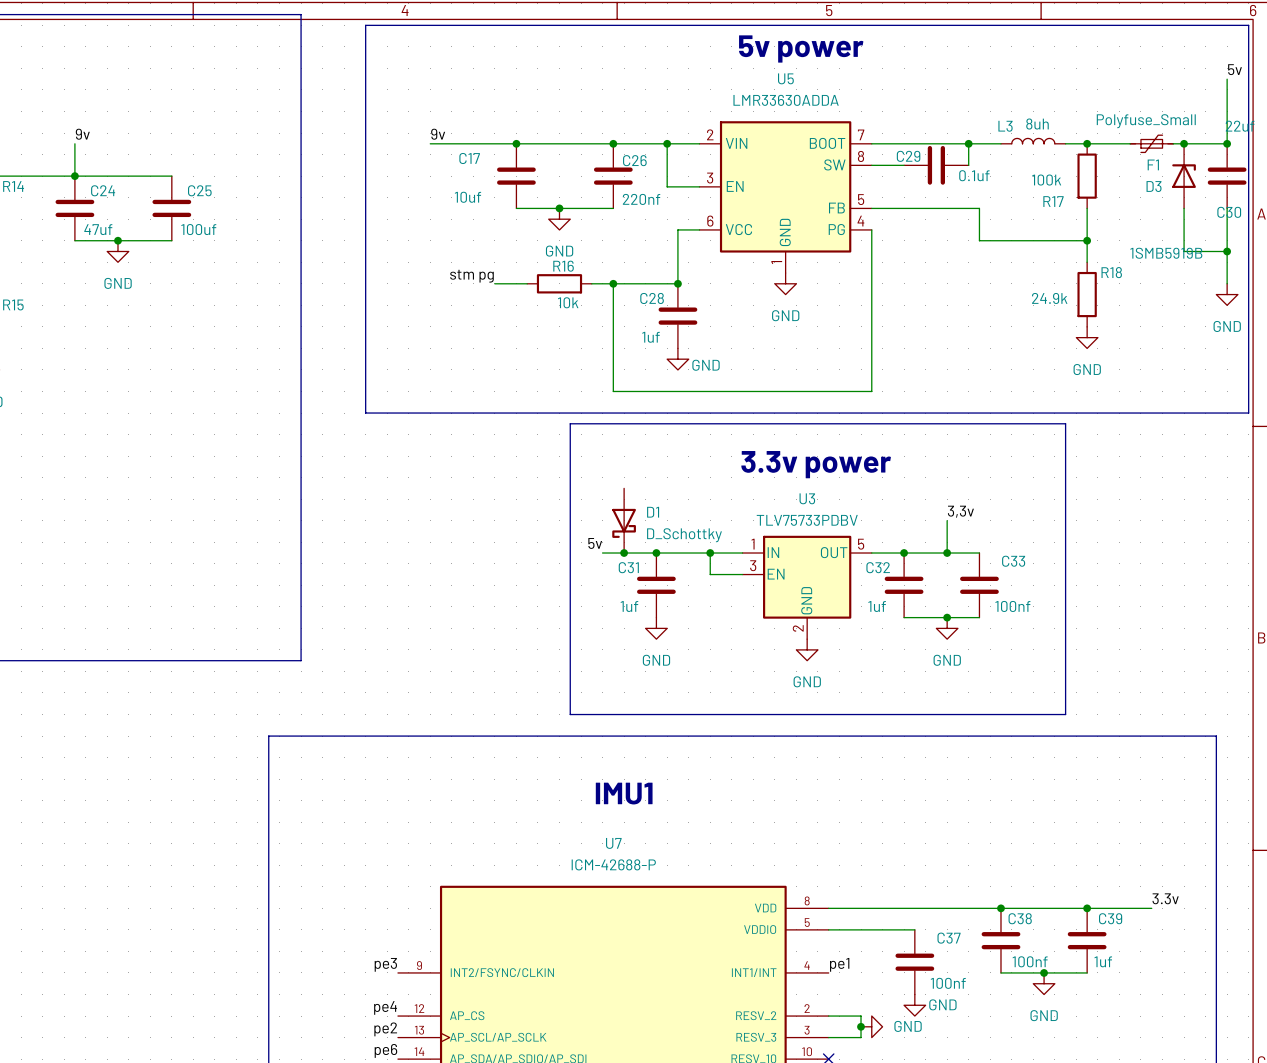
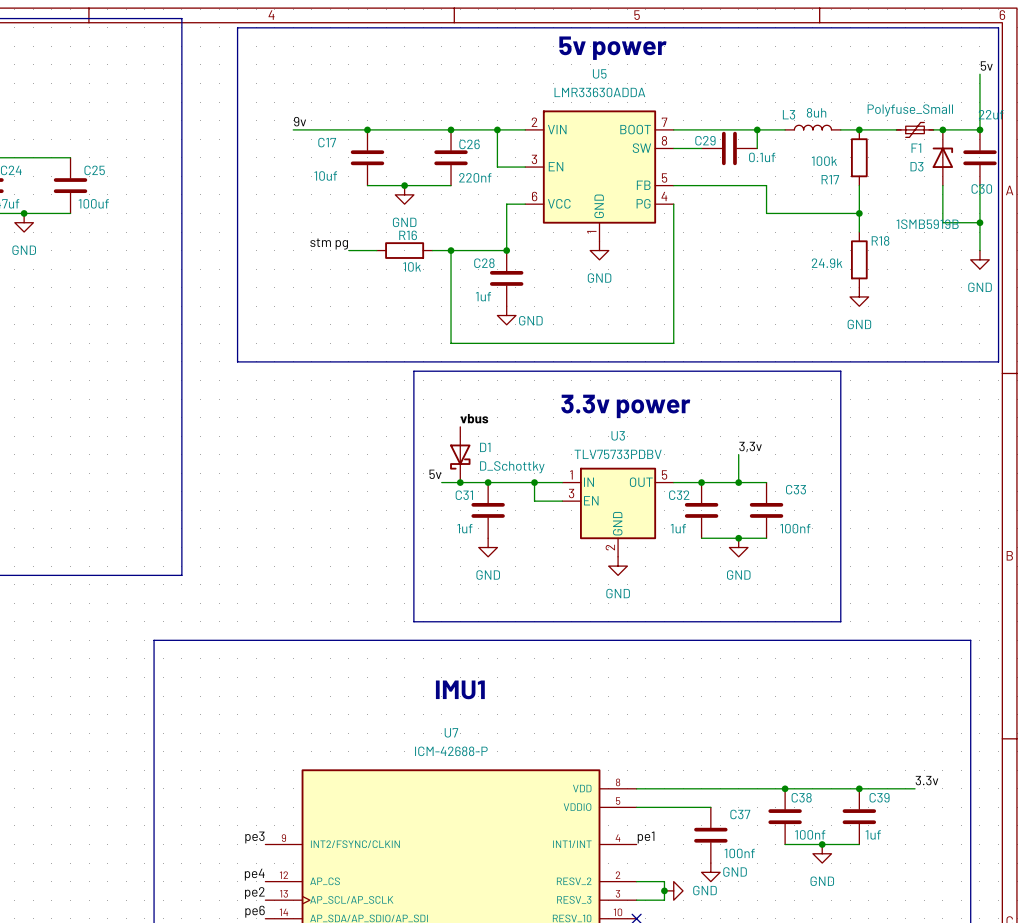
label: none -> vbus (474, 418)

